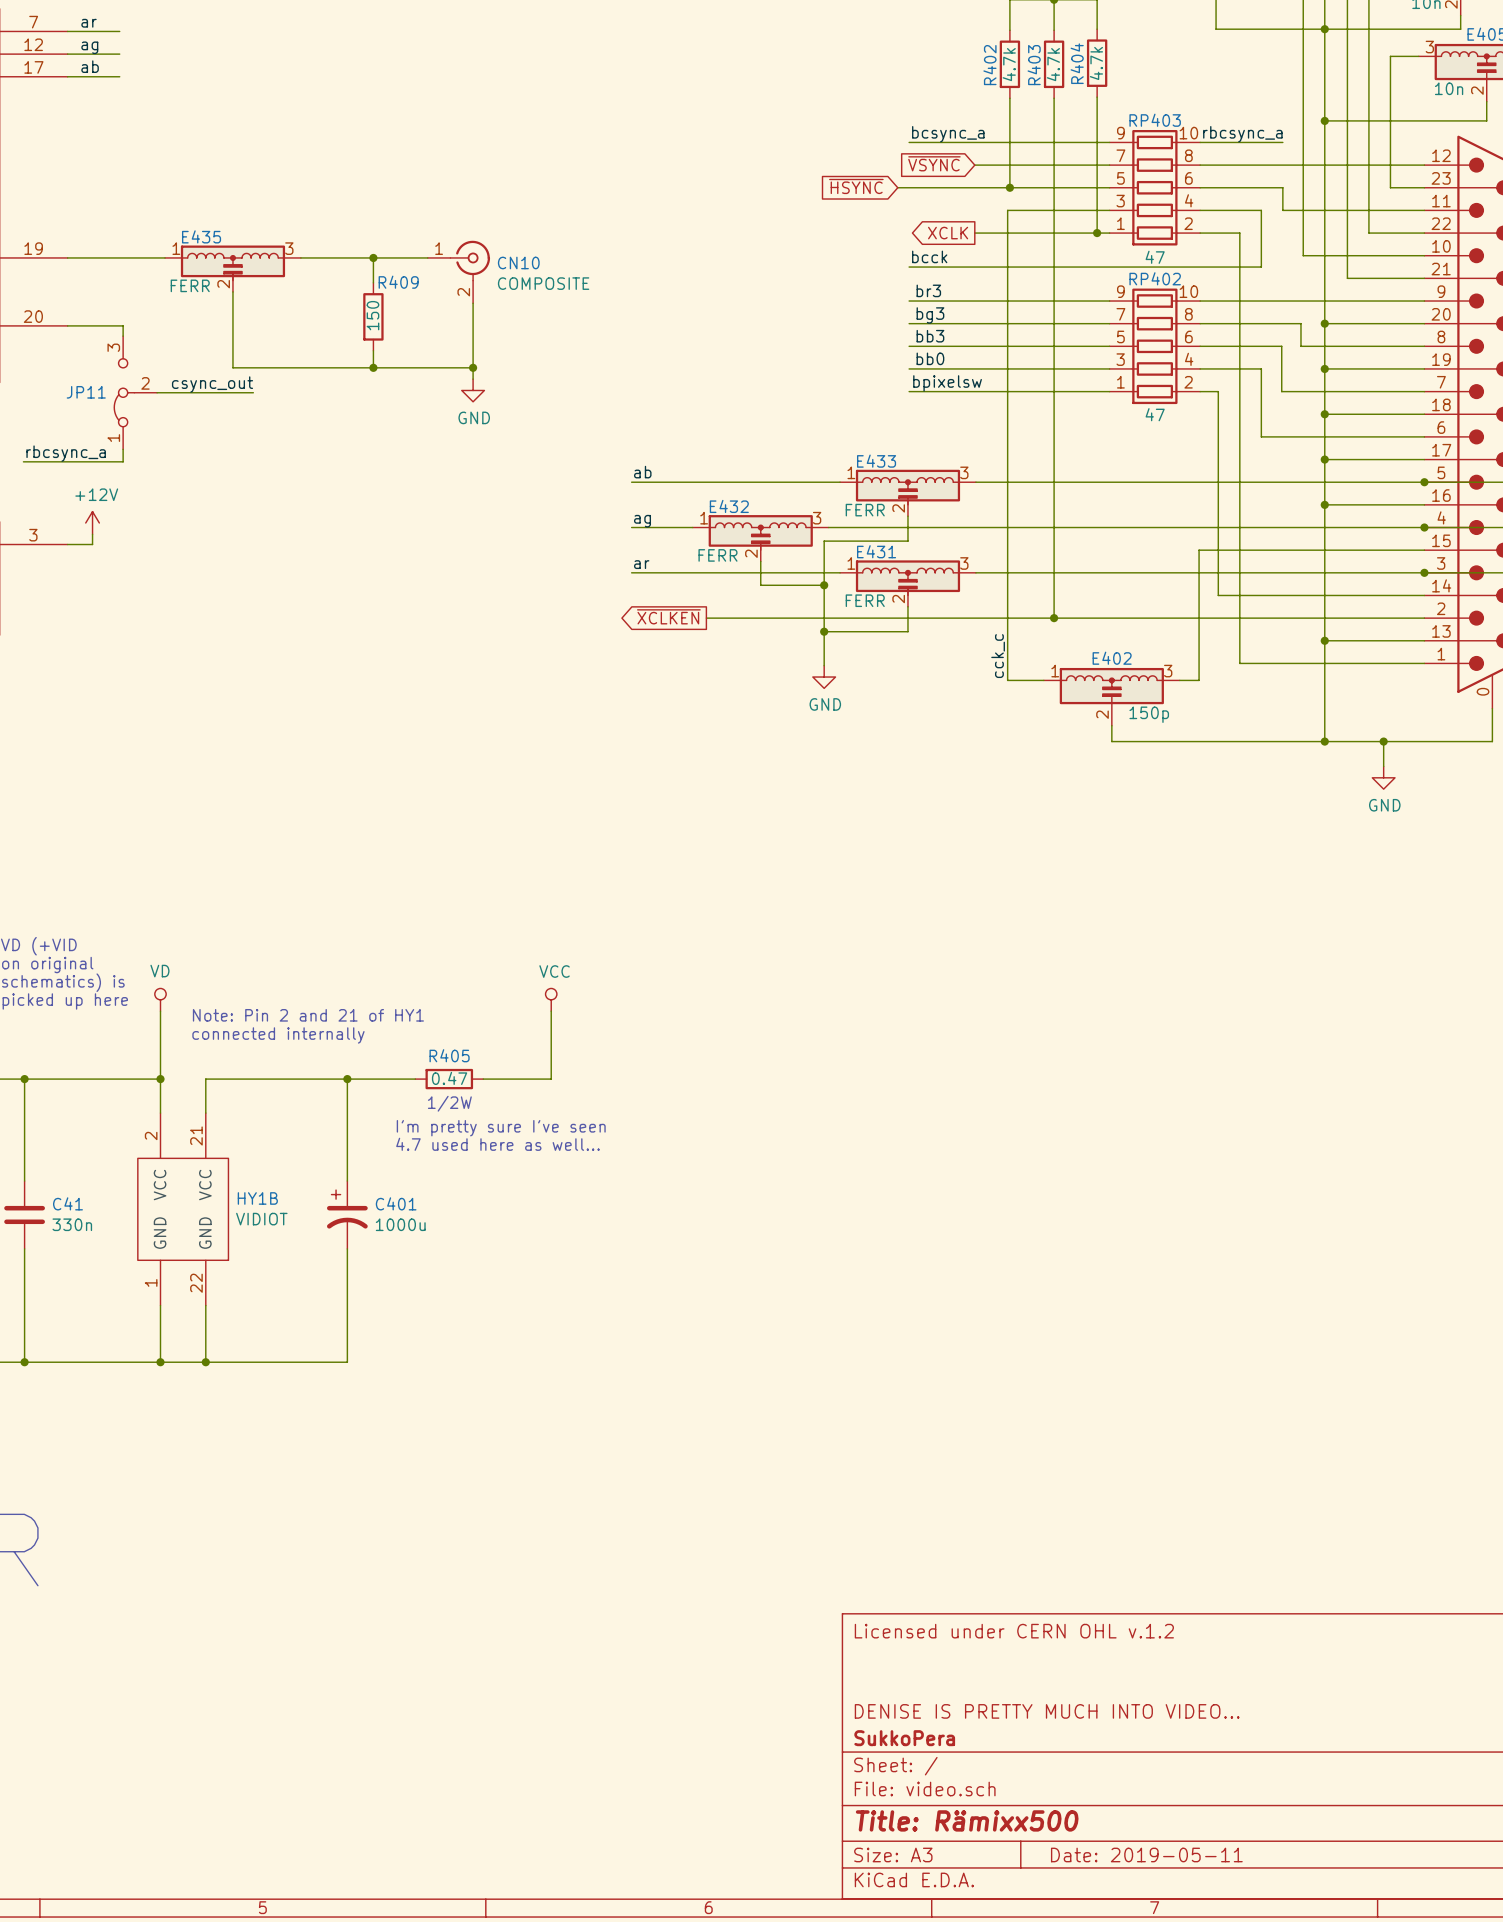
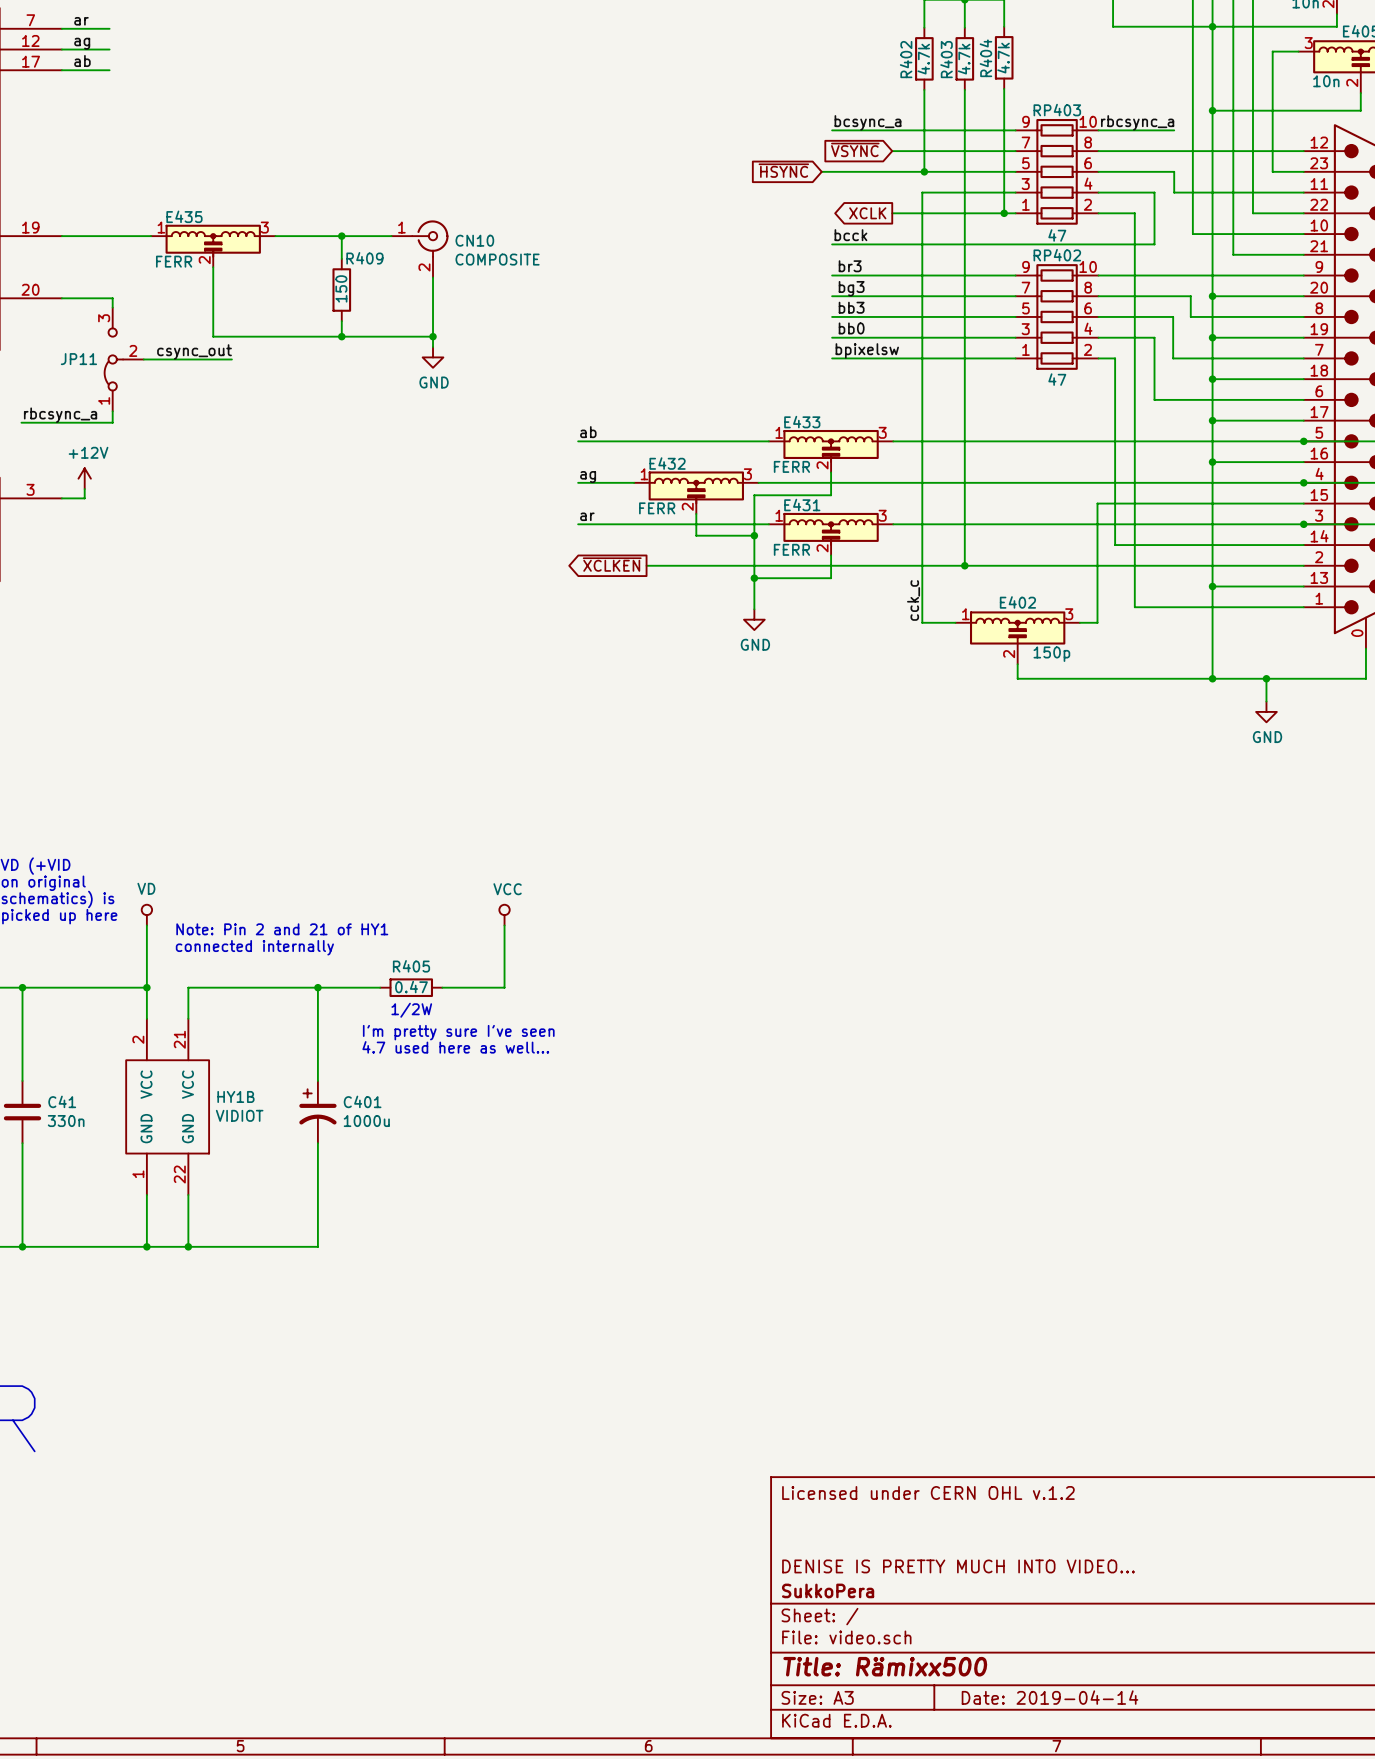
title block: Date: 2019-05-11 (1146, 1854) -> Date: 2019-04-14 (1050, 1697)

